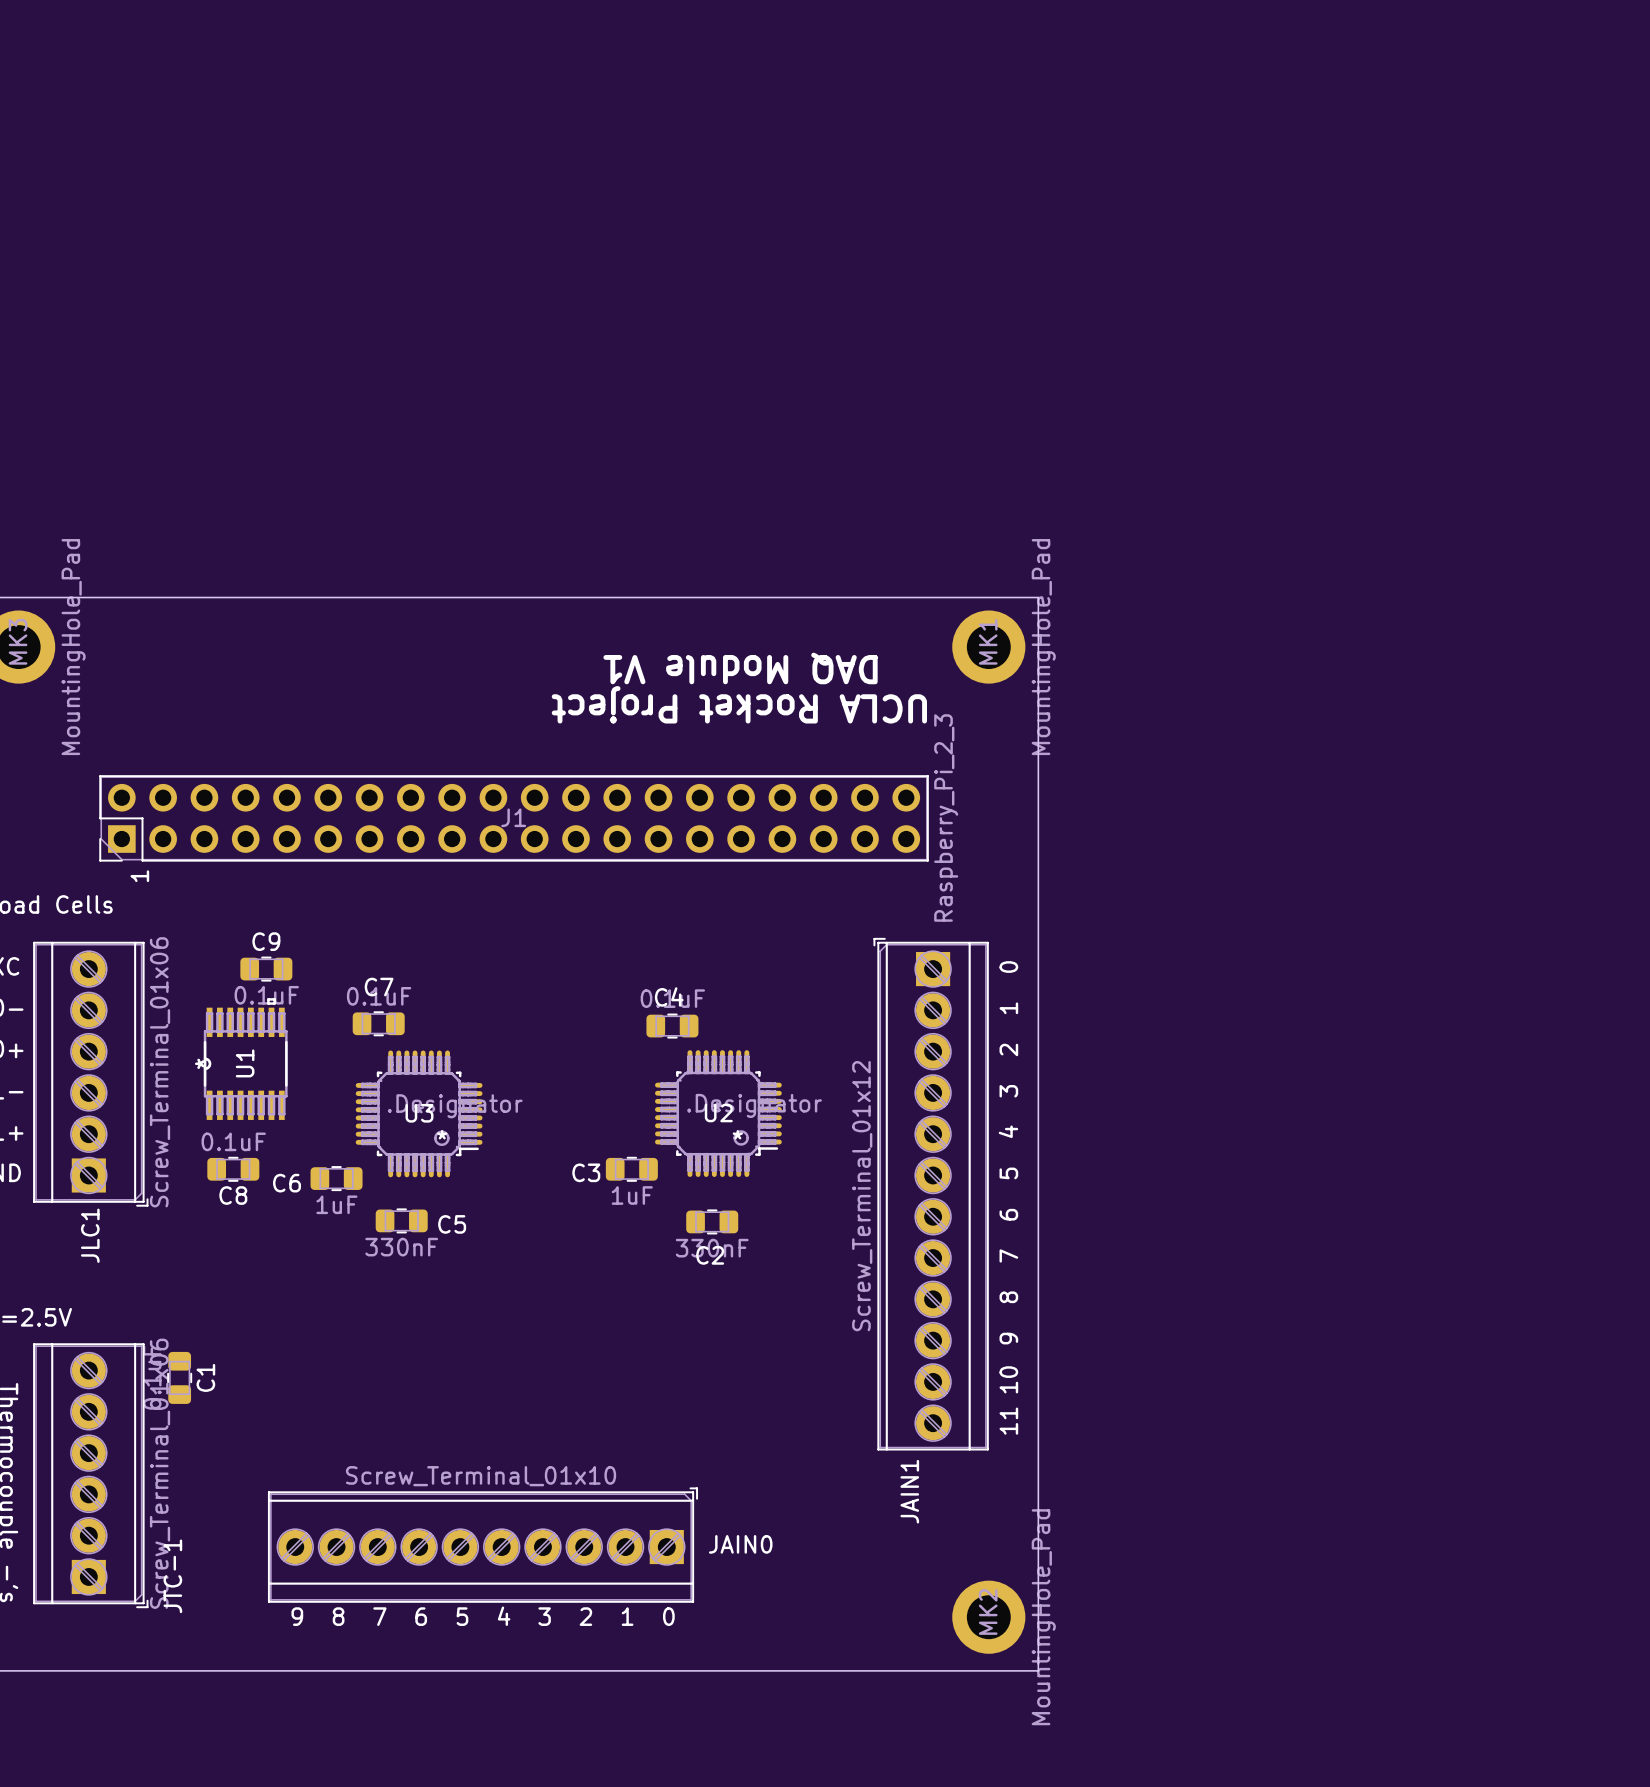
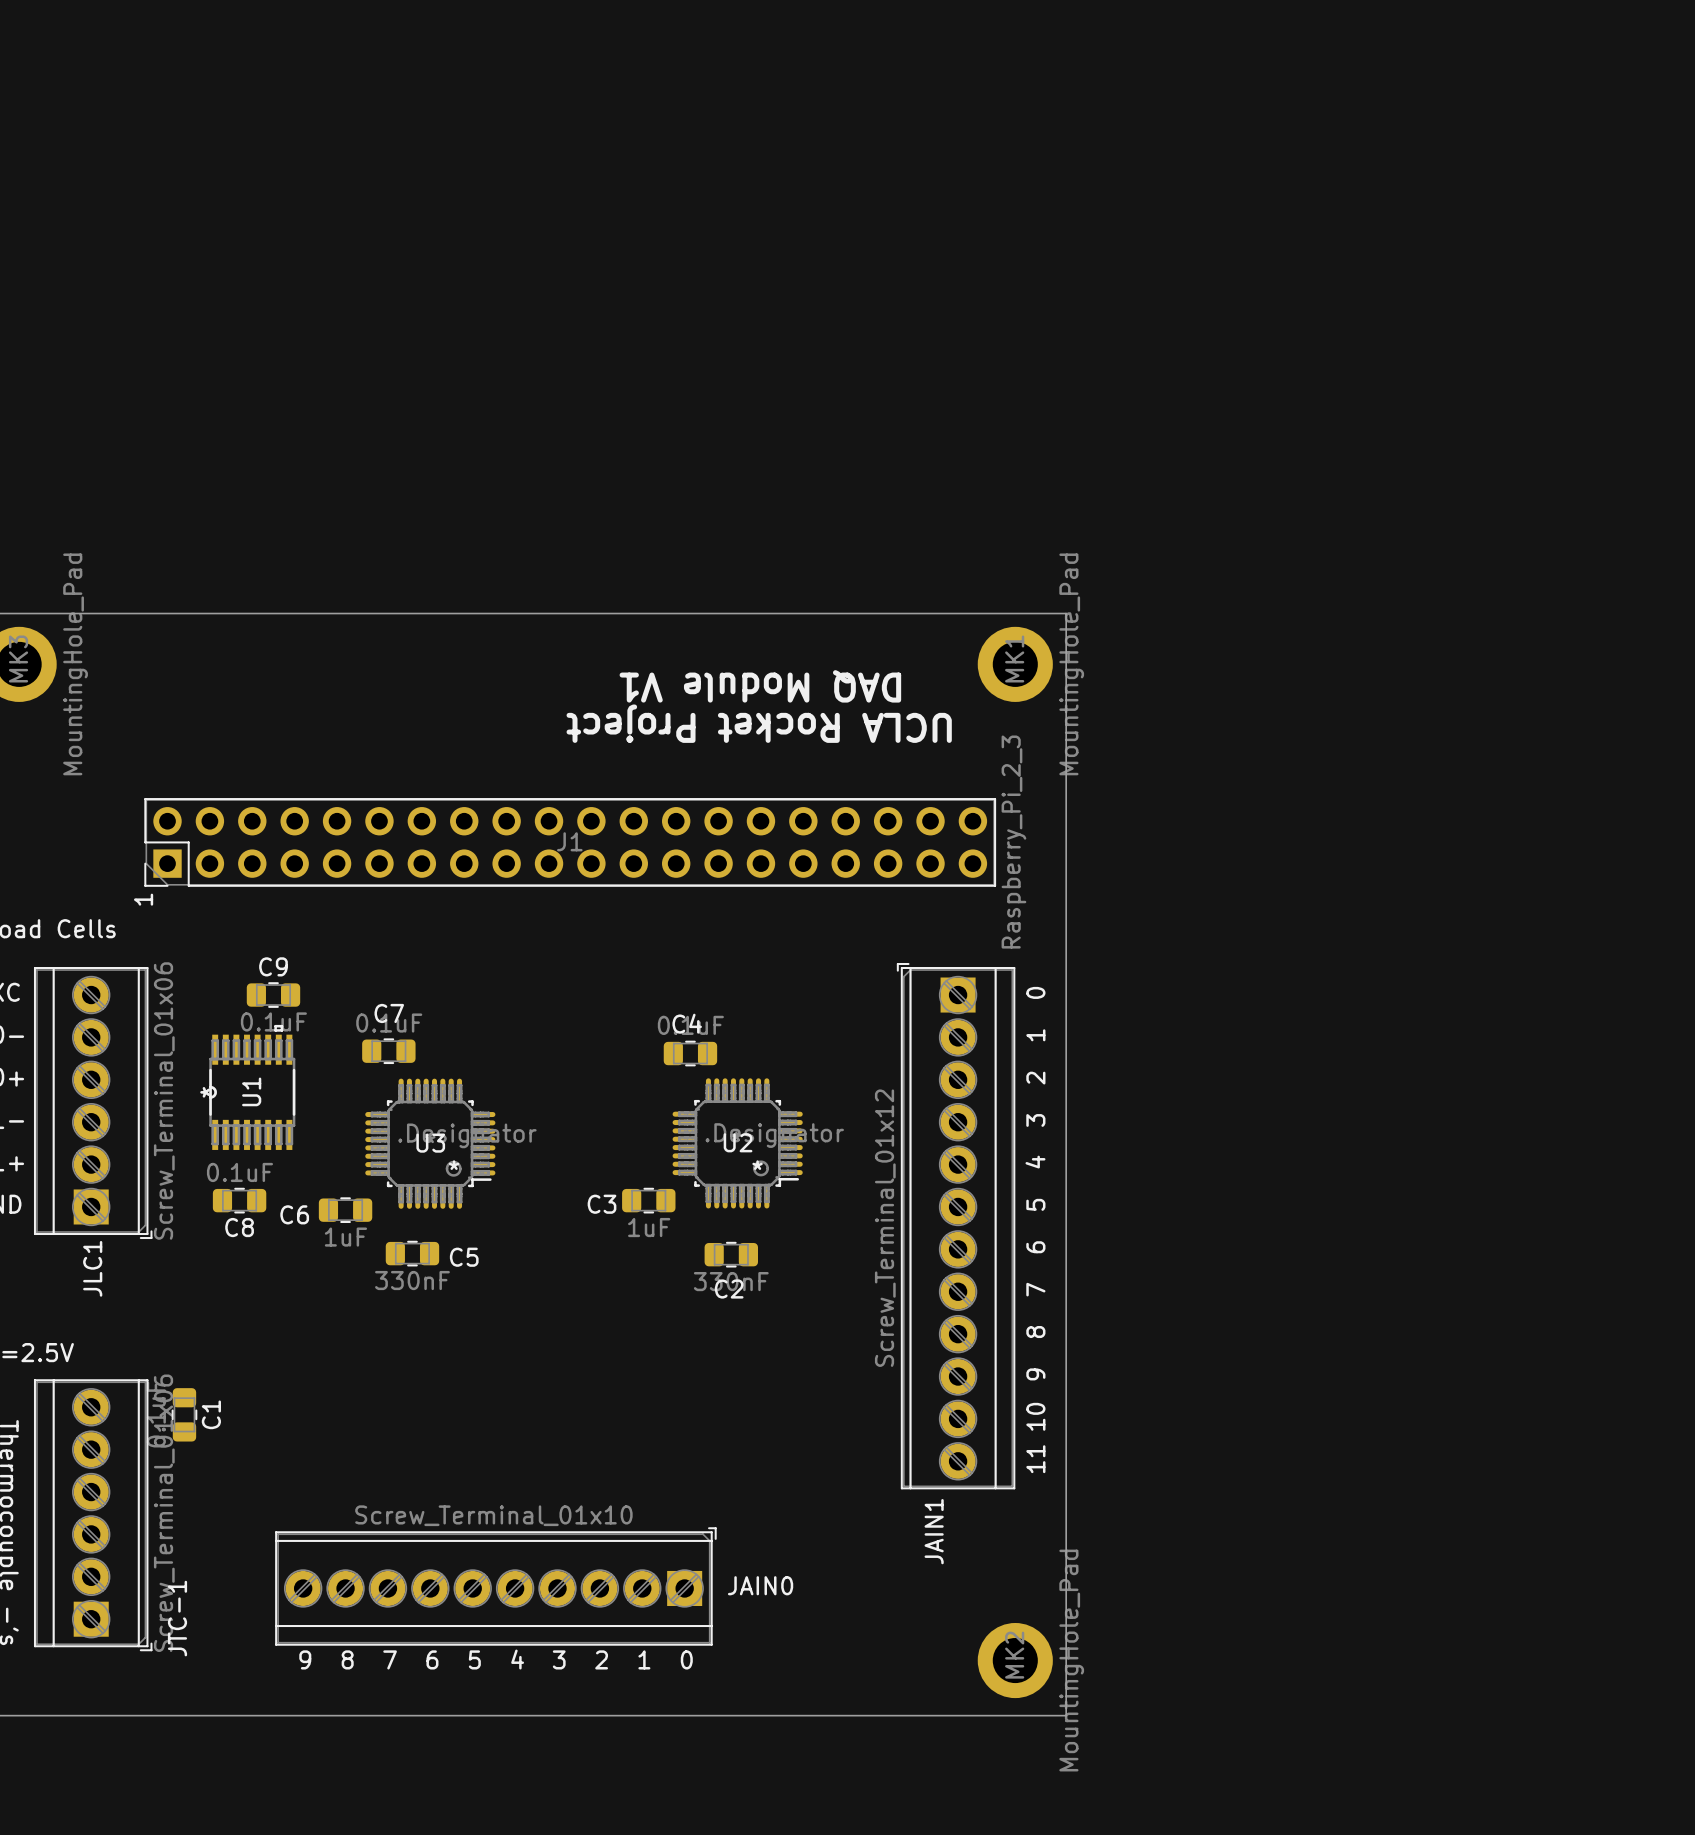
J1 position: (514, 818) -> (570, 842)

